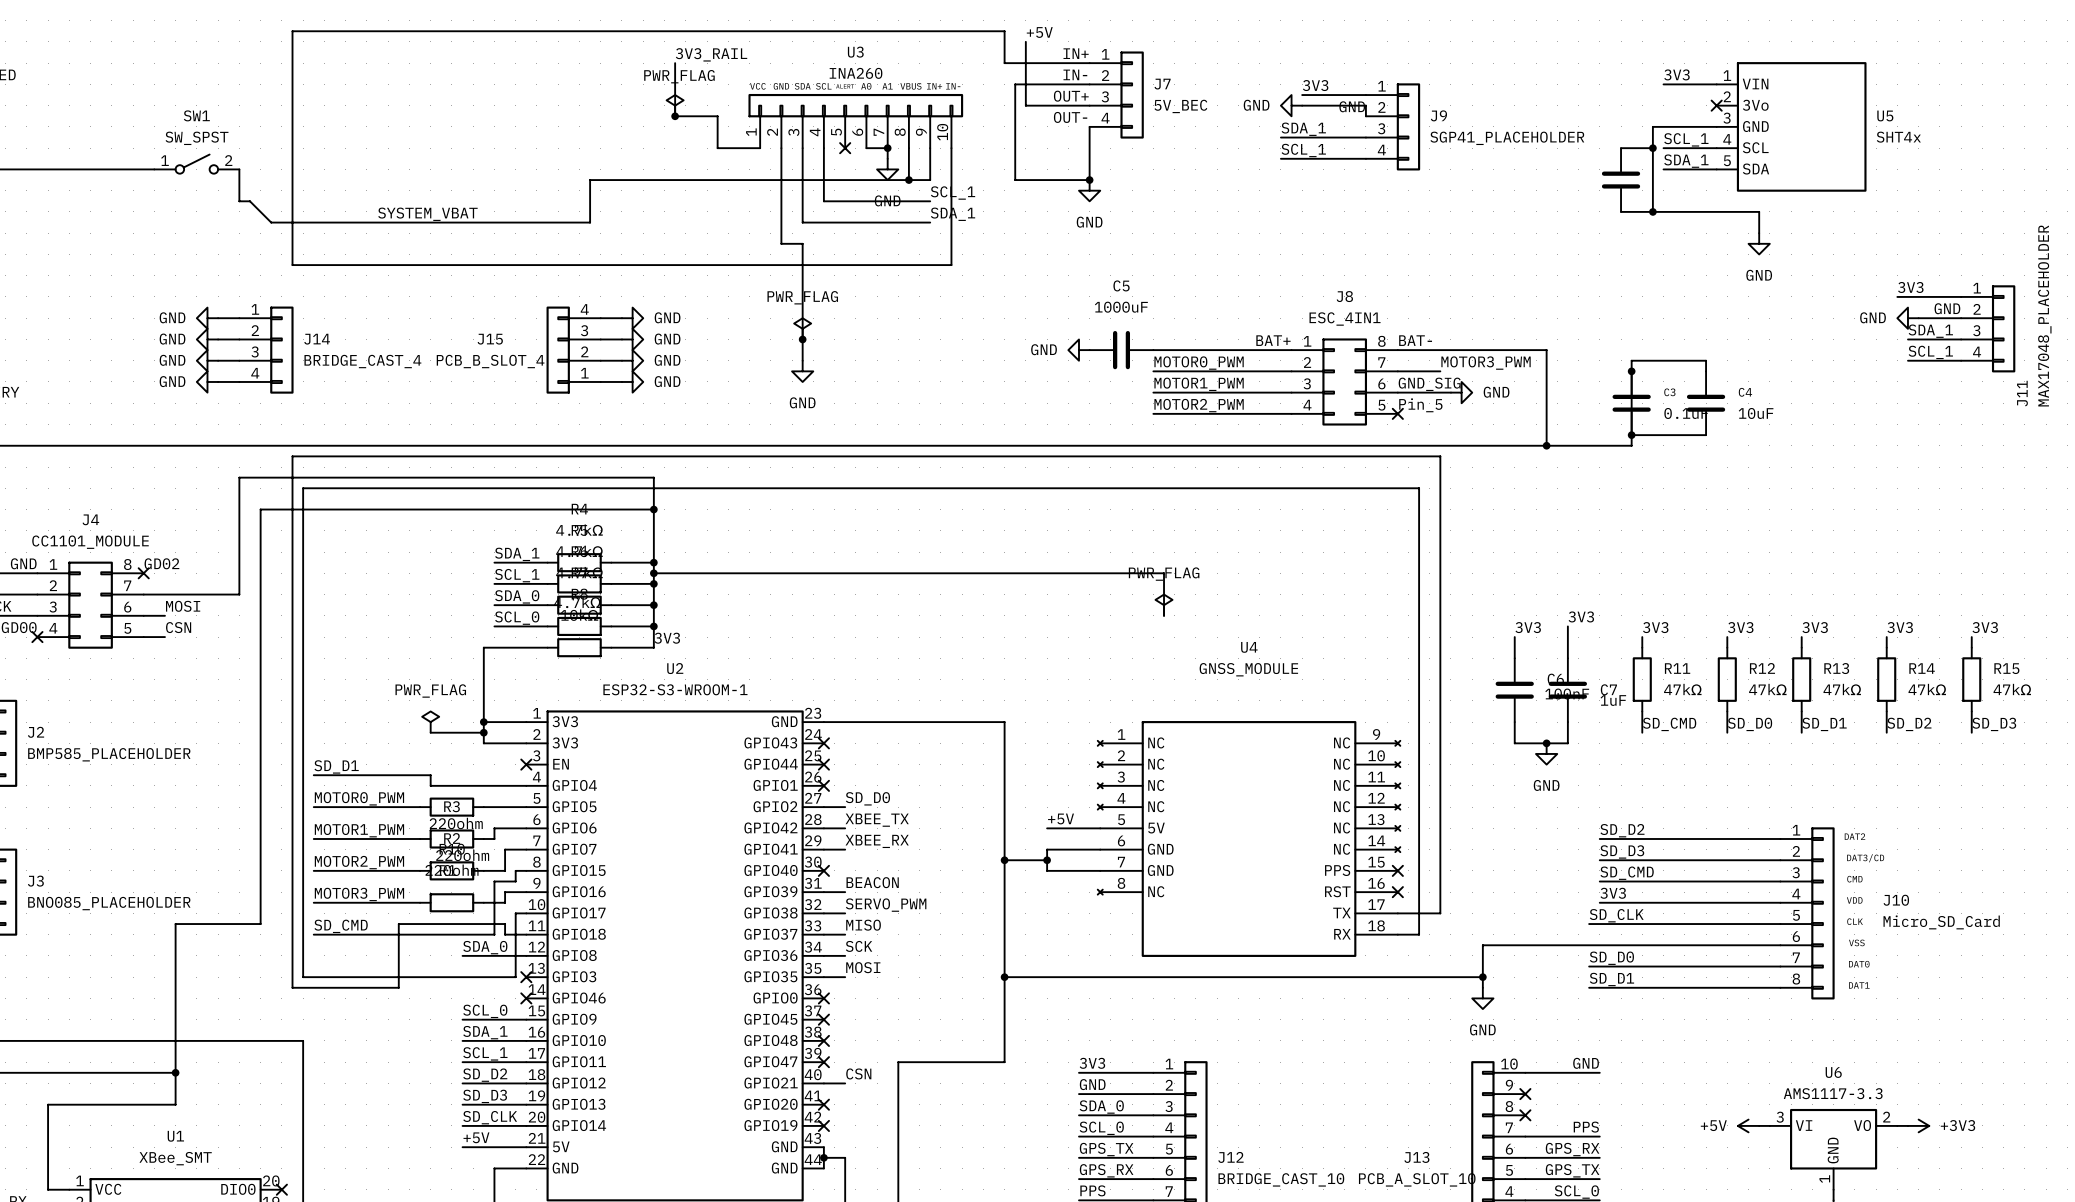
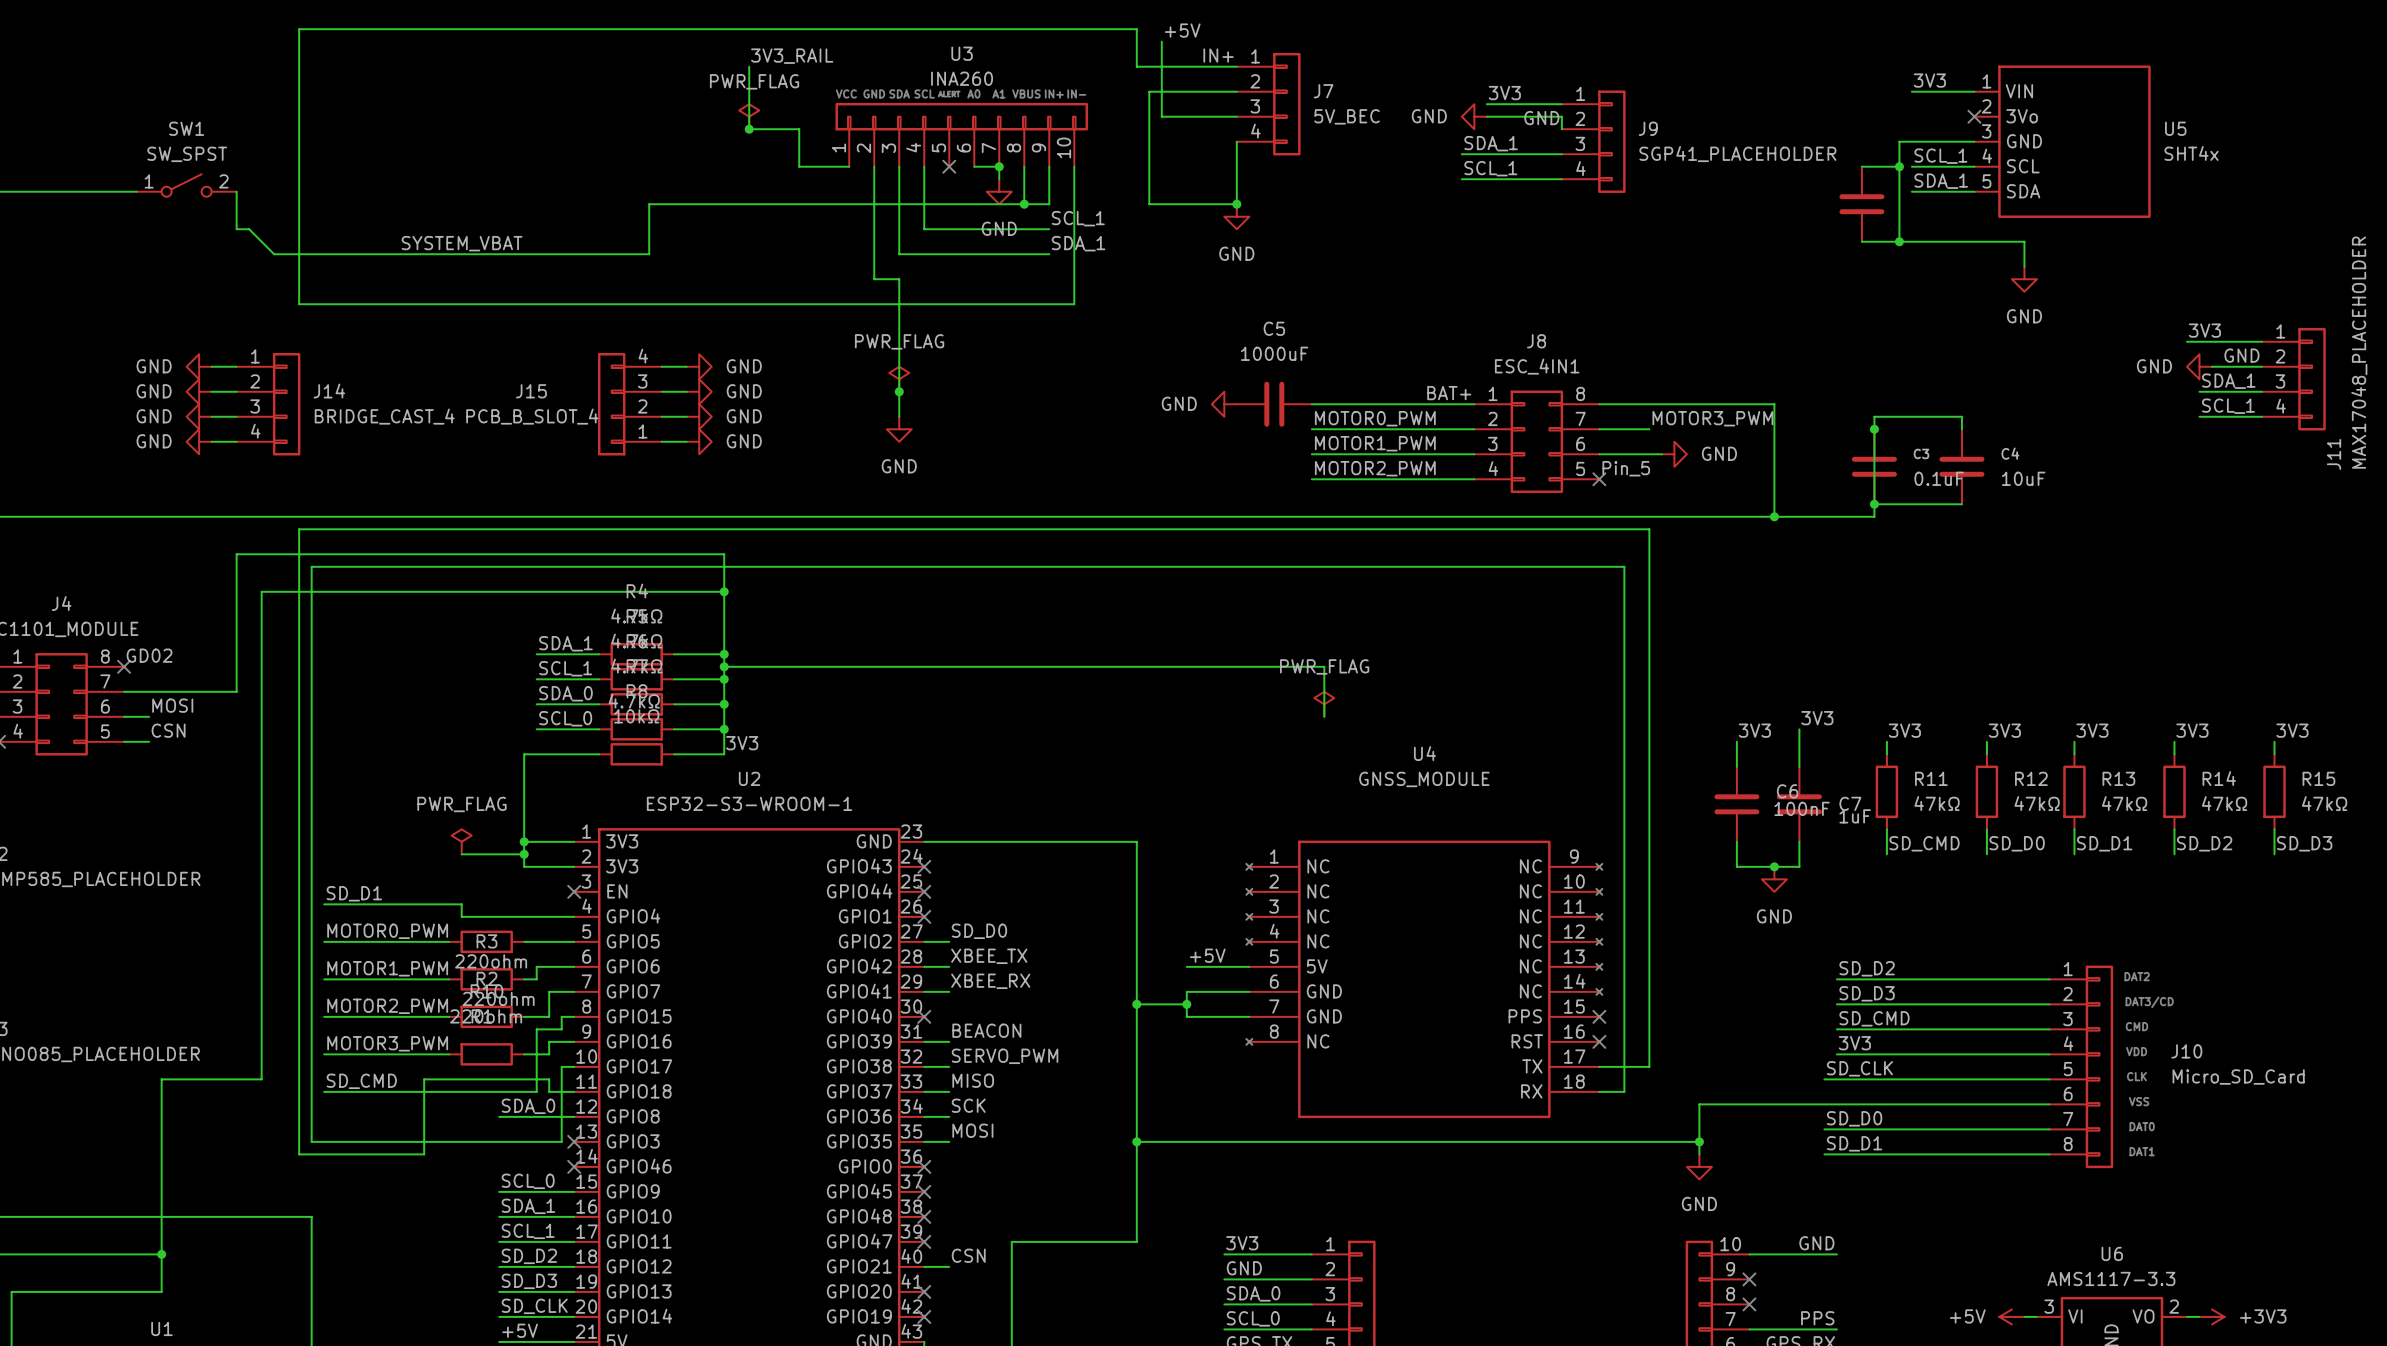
label: IN- (1075, 74) -> none
label: OUT+ (1071, 96) -> none
label: OUT- (1070, 117) -> none
label: BAT- (1415, 340) -> none
label: GND_SIG (1429, 384) -> none

